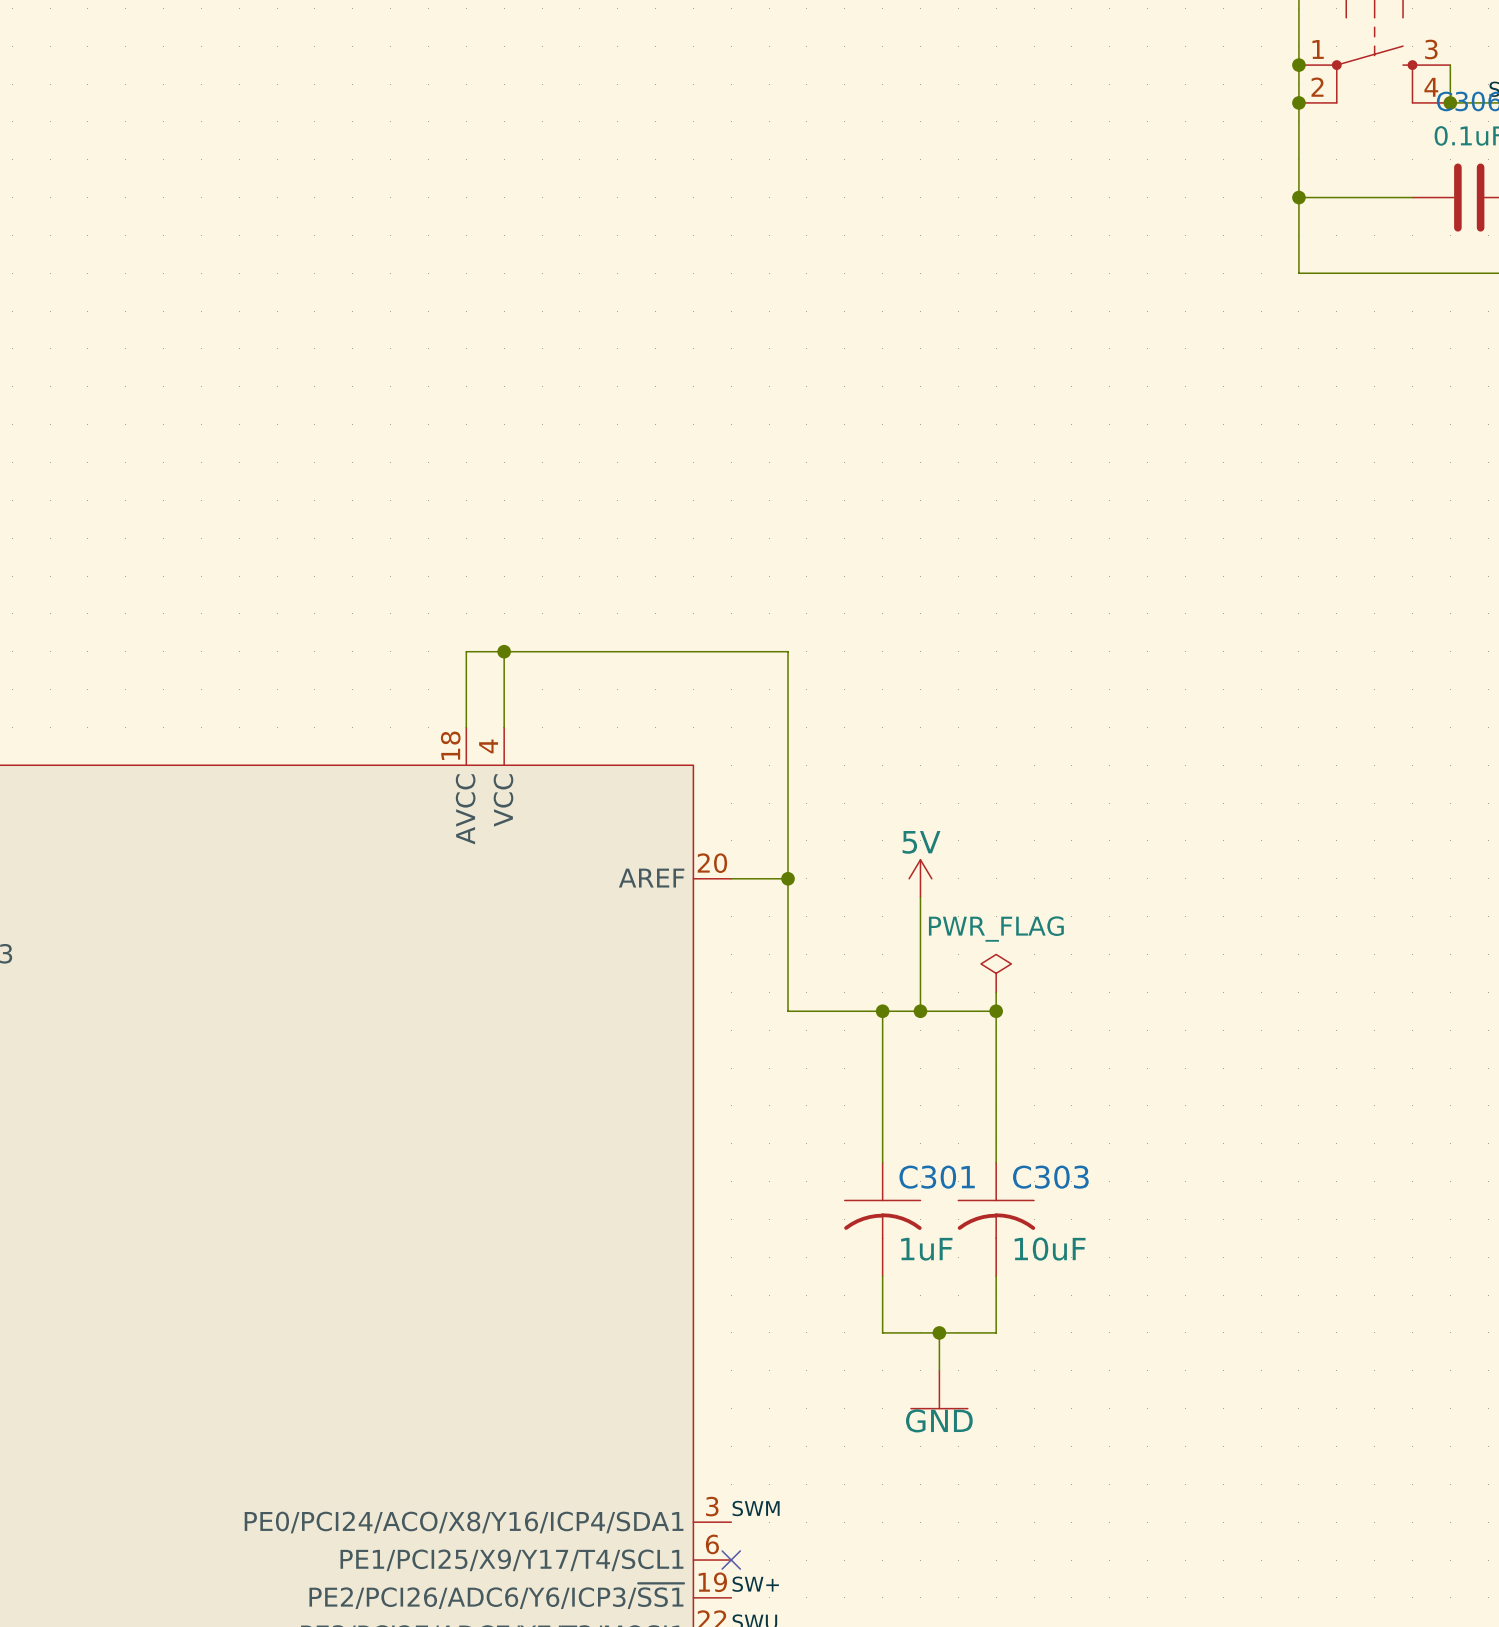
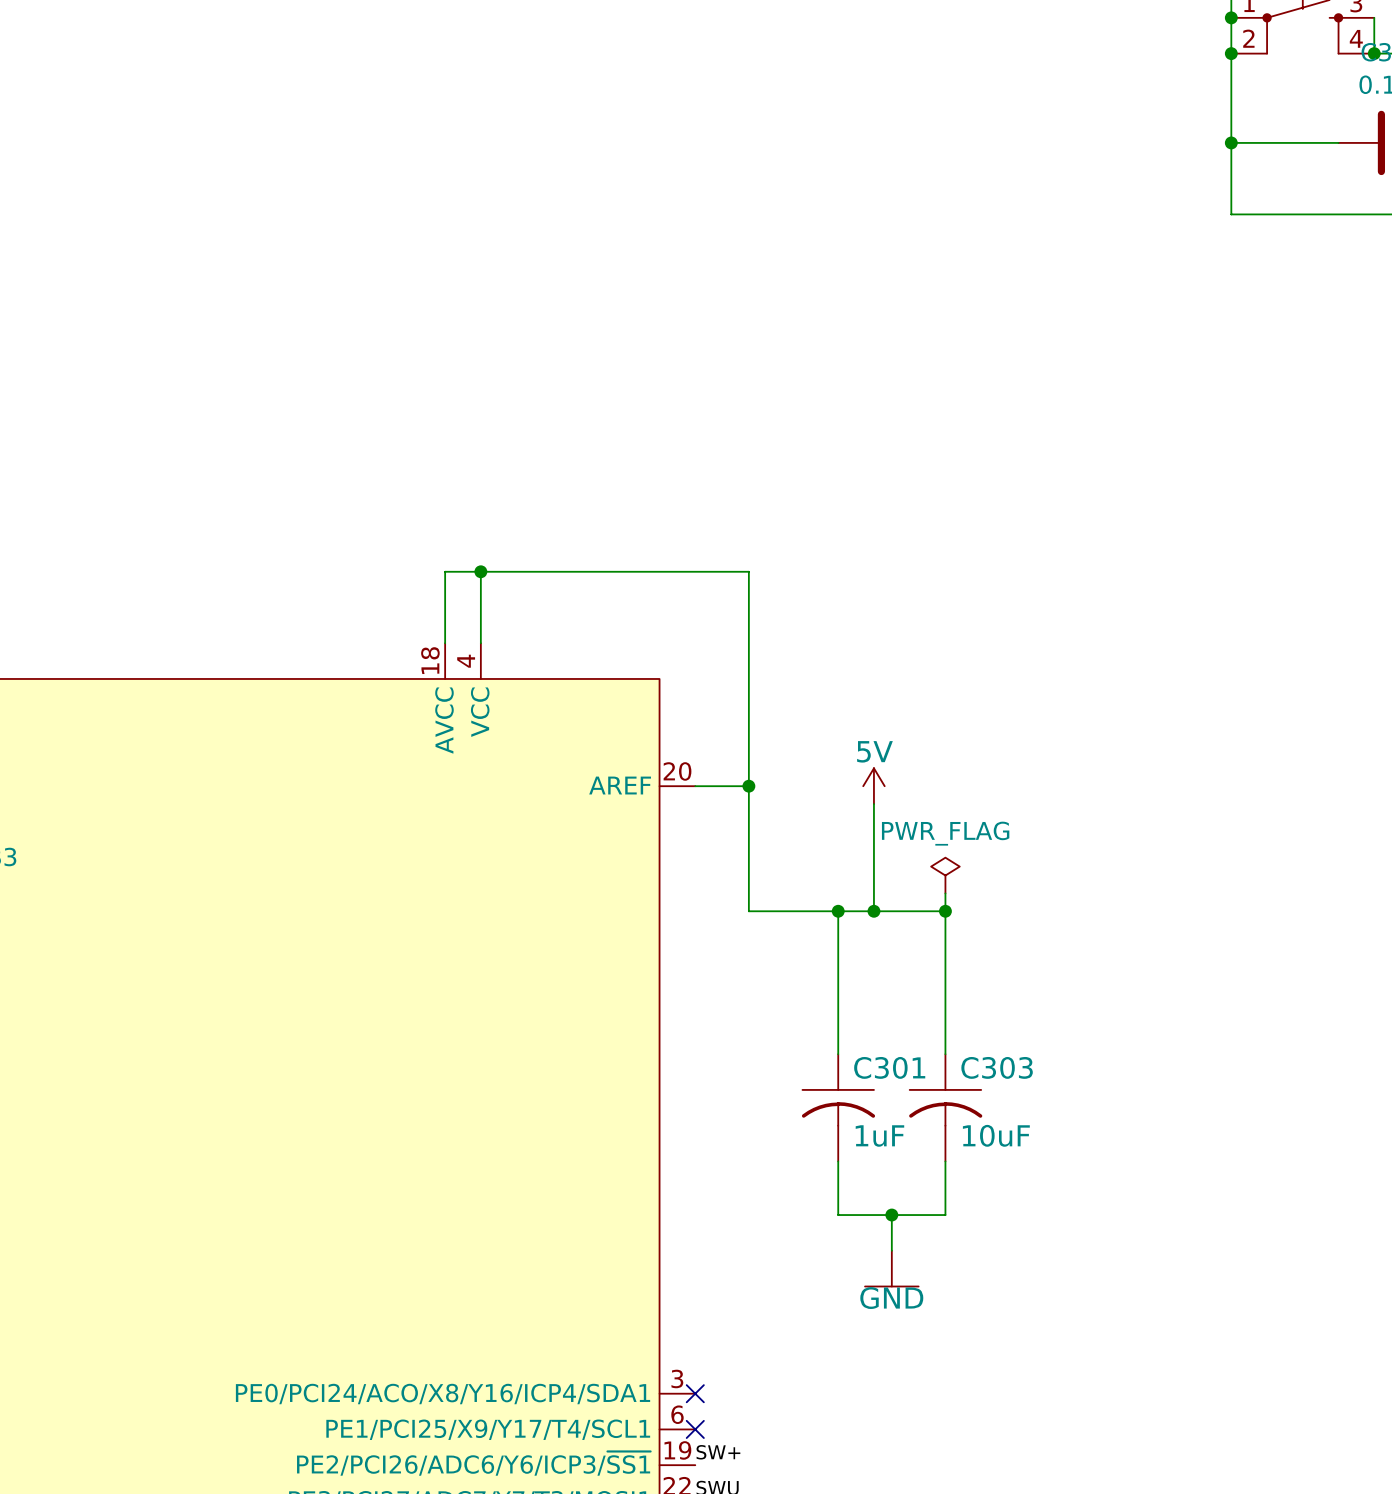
label: SWM (756, 1508) -> none
no-connect mark: none -> (695, 1393)

